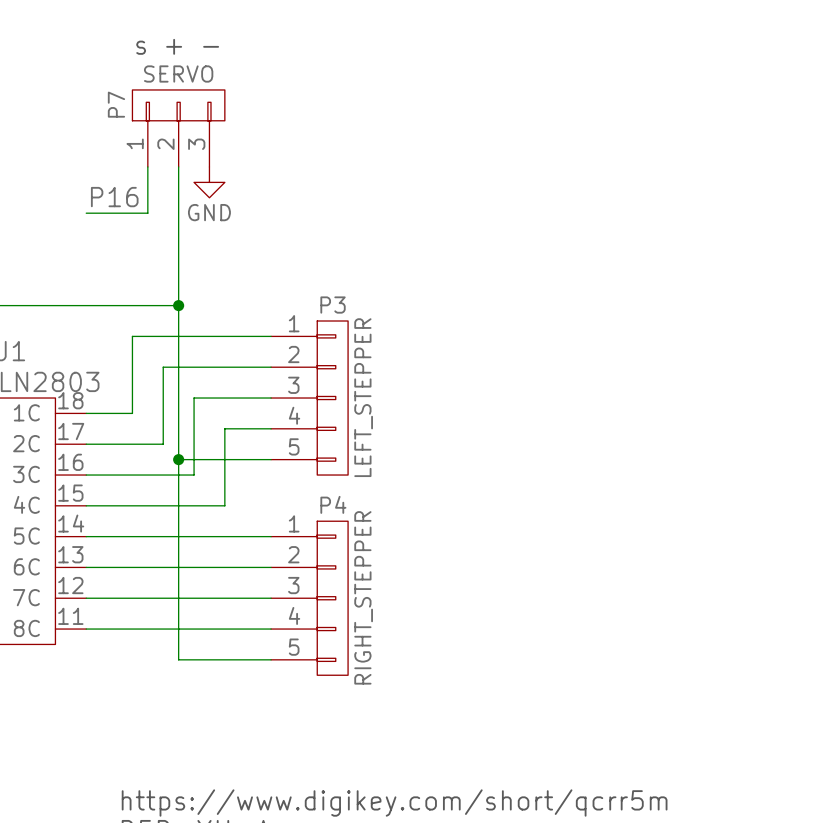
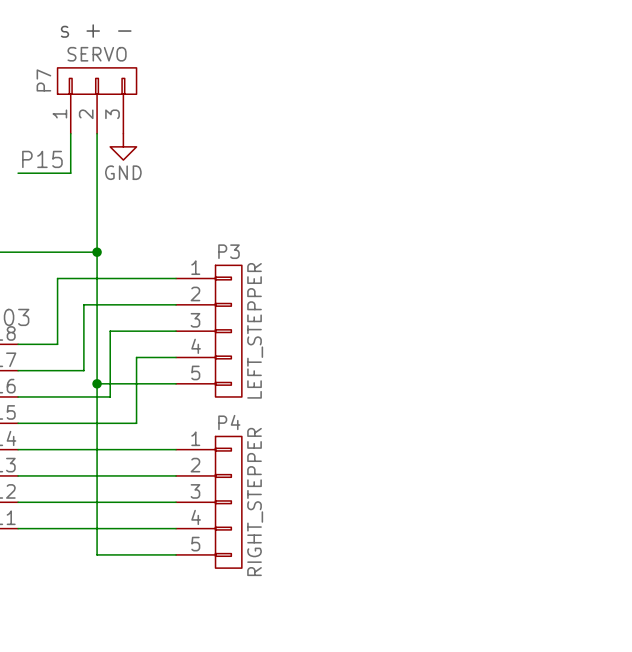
label: P16 (114, 197) -> P15 (42, 159)

